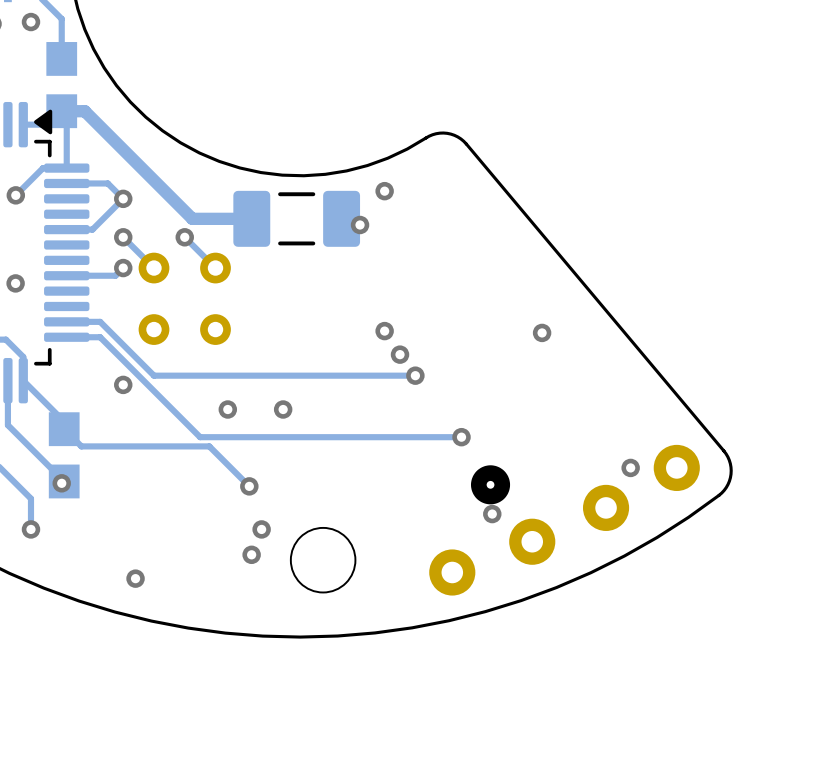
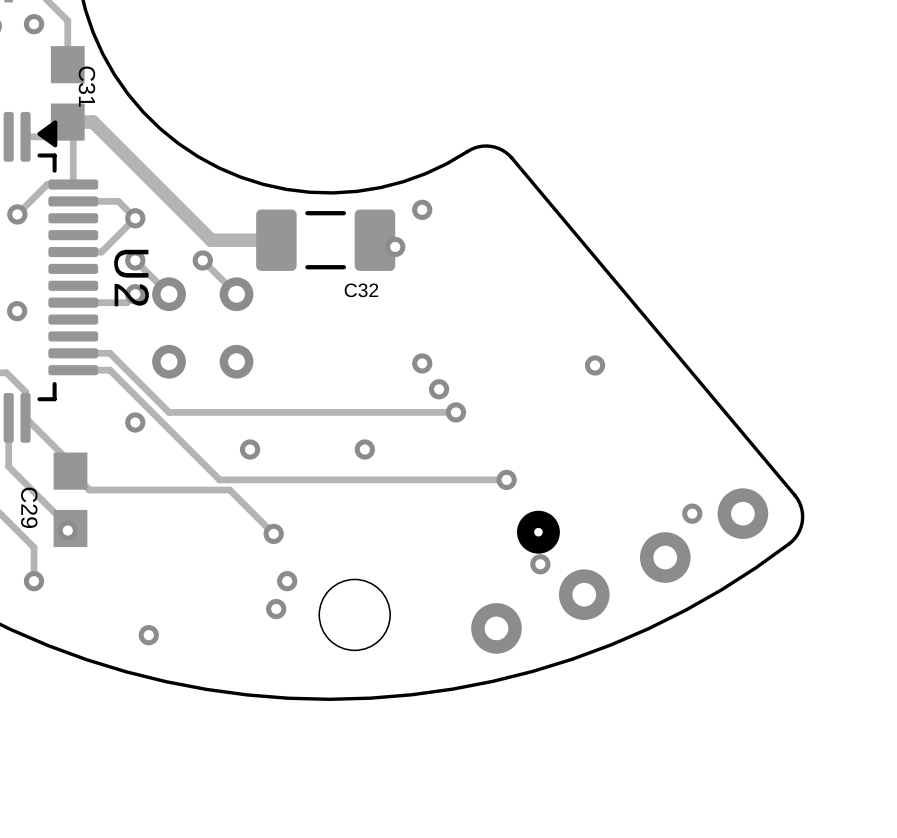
C31 name: none -> C31 (86, 86)
U2 name: none -> U2 (131, 278)
C32 name: none -> C32 (361, 290)
via position: (283, 409) -> (364, 449)
C29 name: none -> C29 (29, 507)

